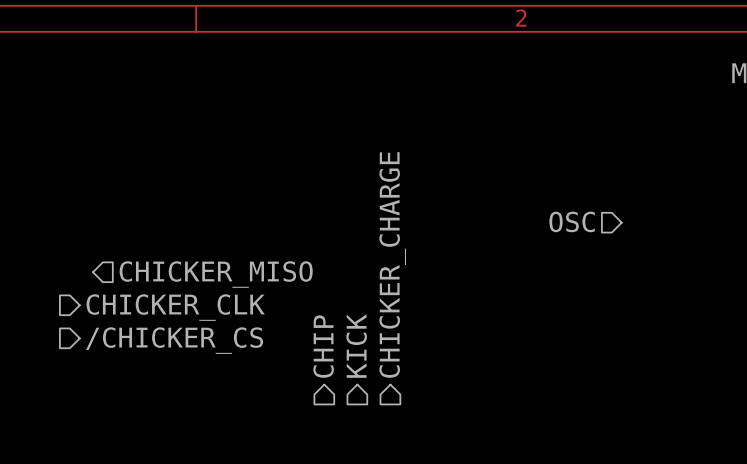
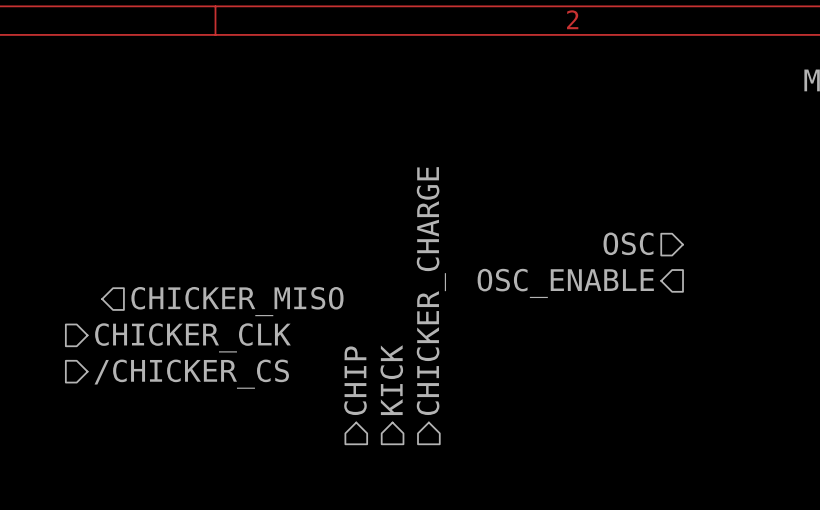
hierarchical label: none -> OSC_ENABLE (565, 283)

